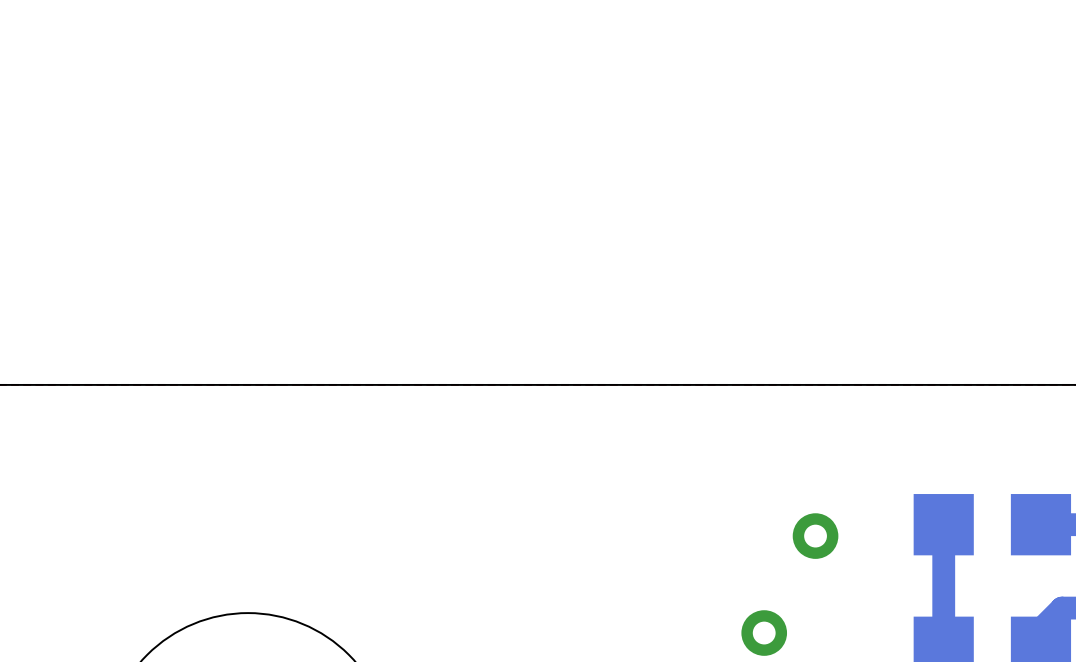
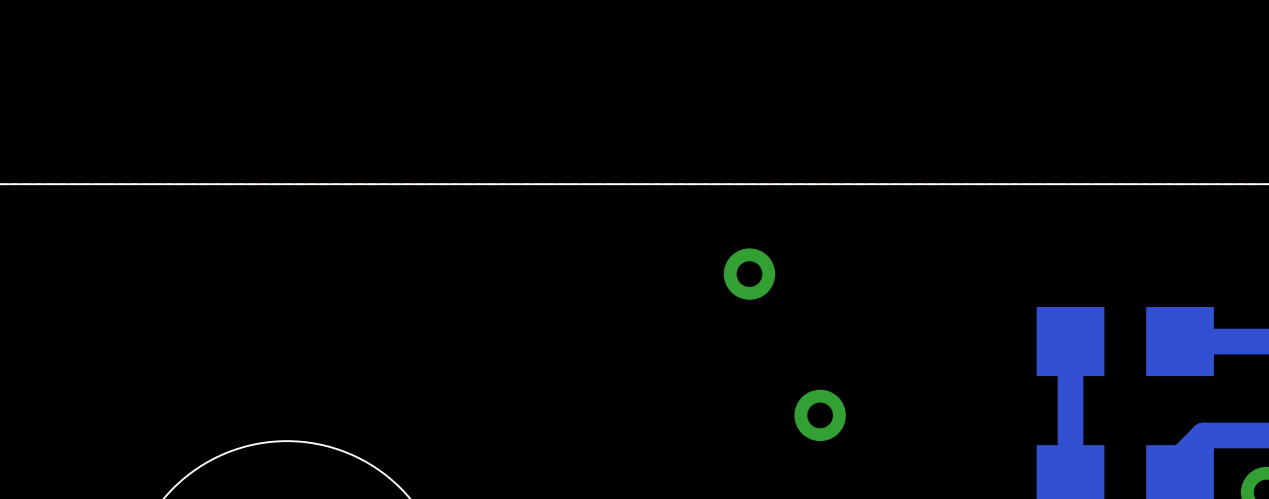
via: none -> (749, 274)
via: (815, 536) -> none
via position: (764, 633) -> (820, 415)

